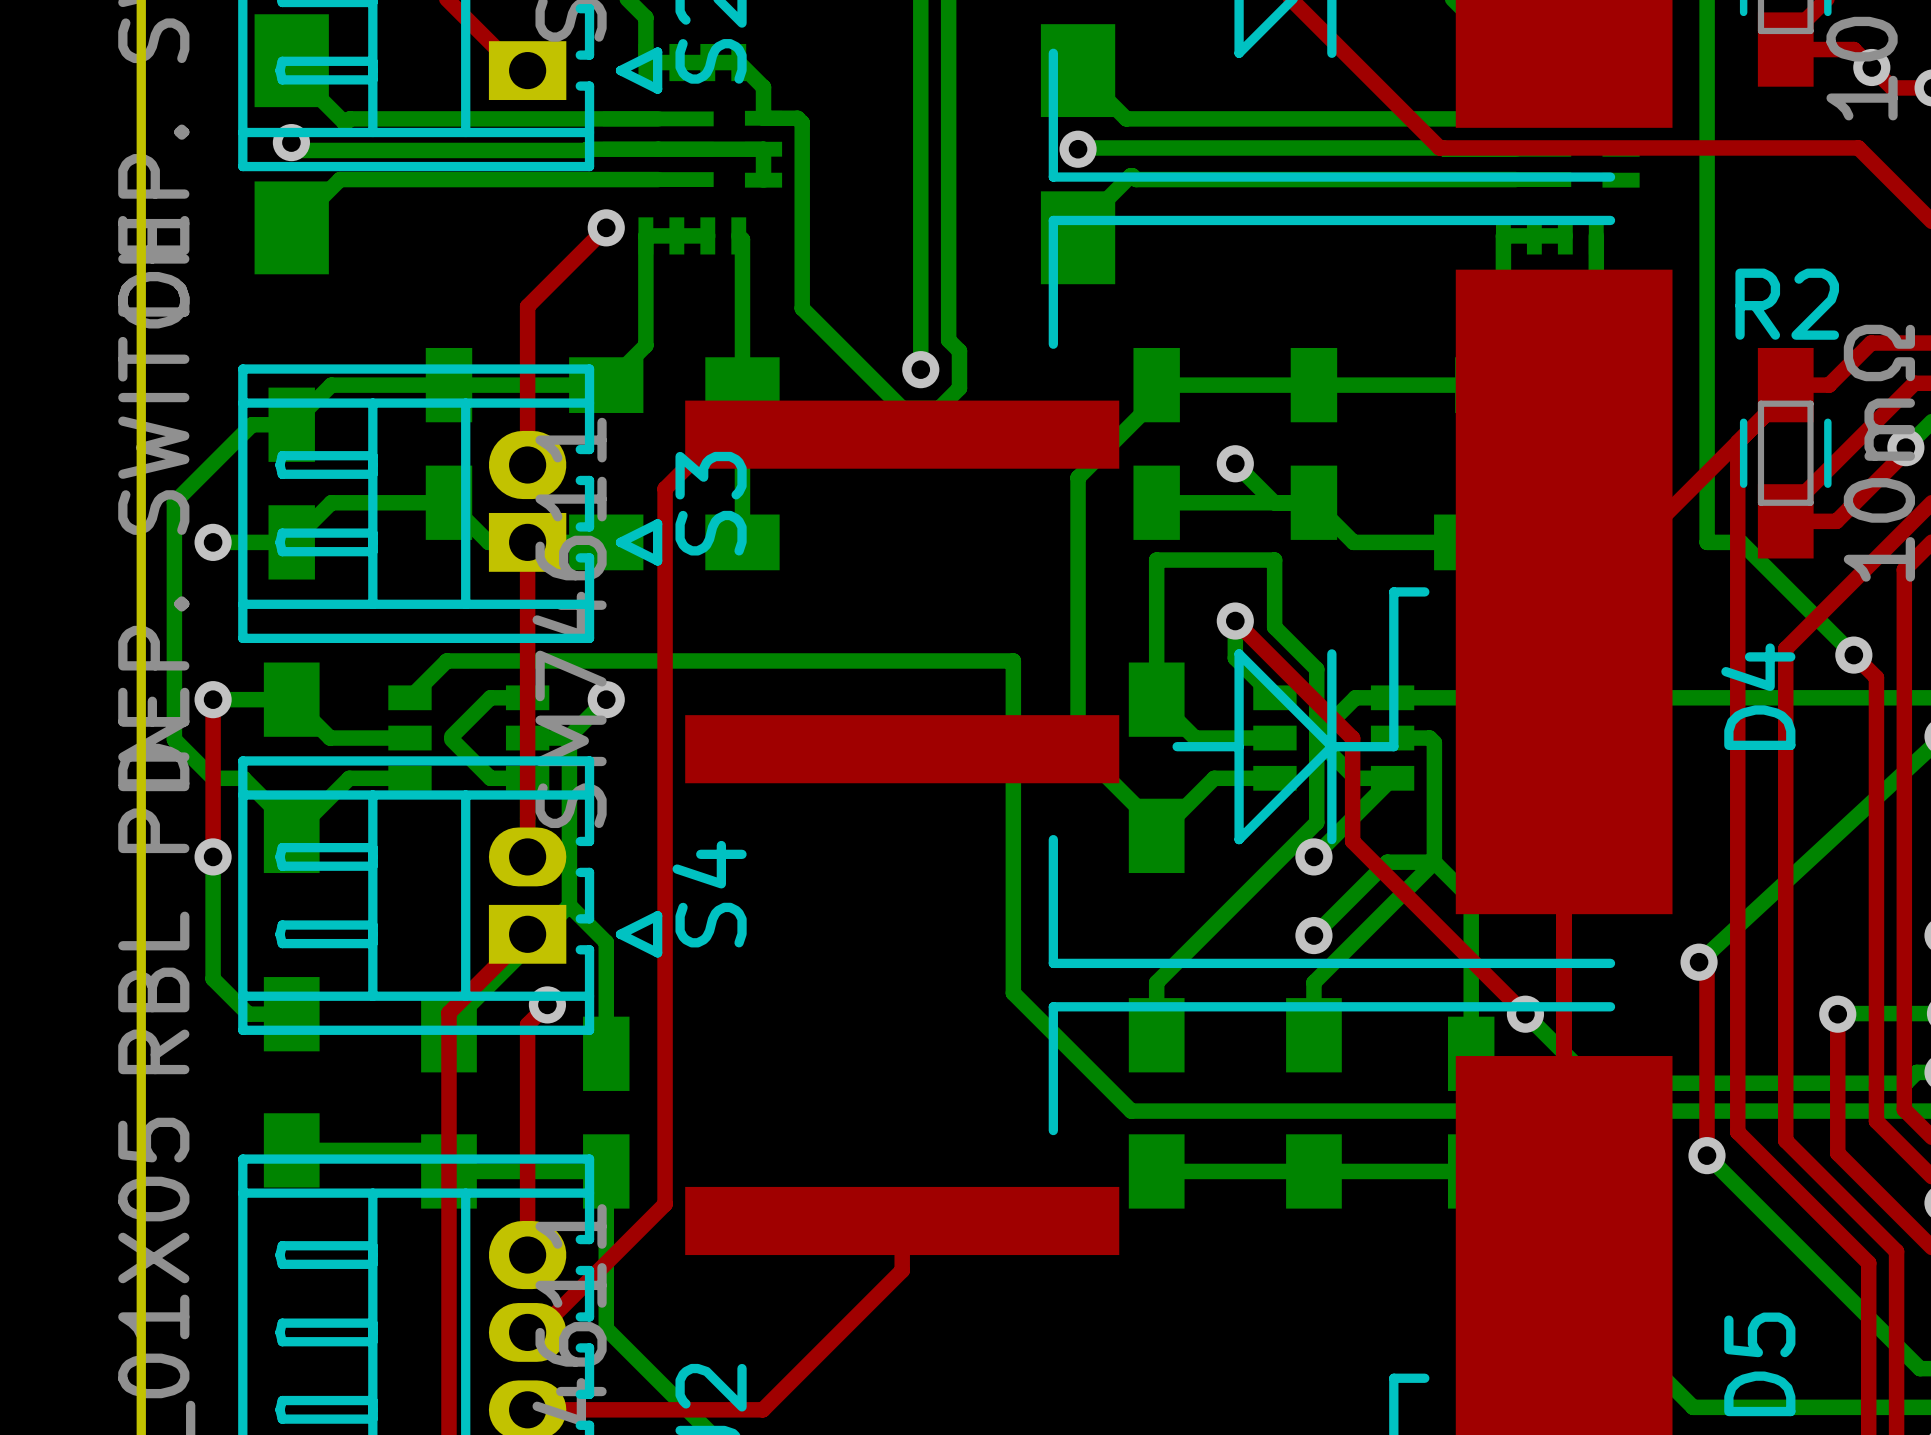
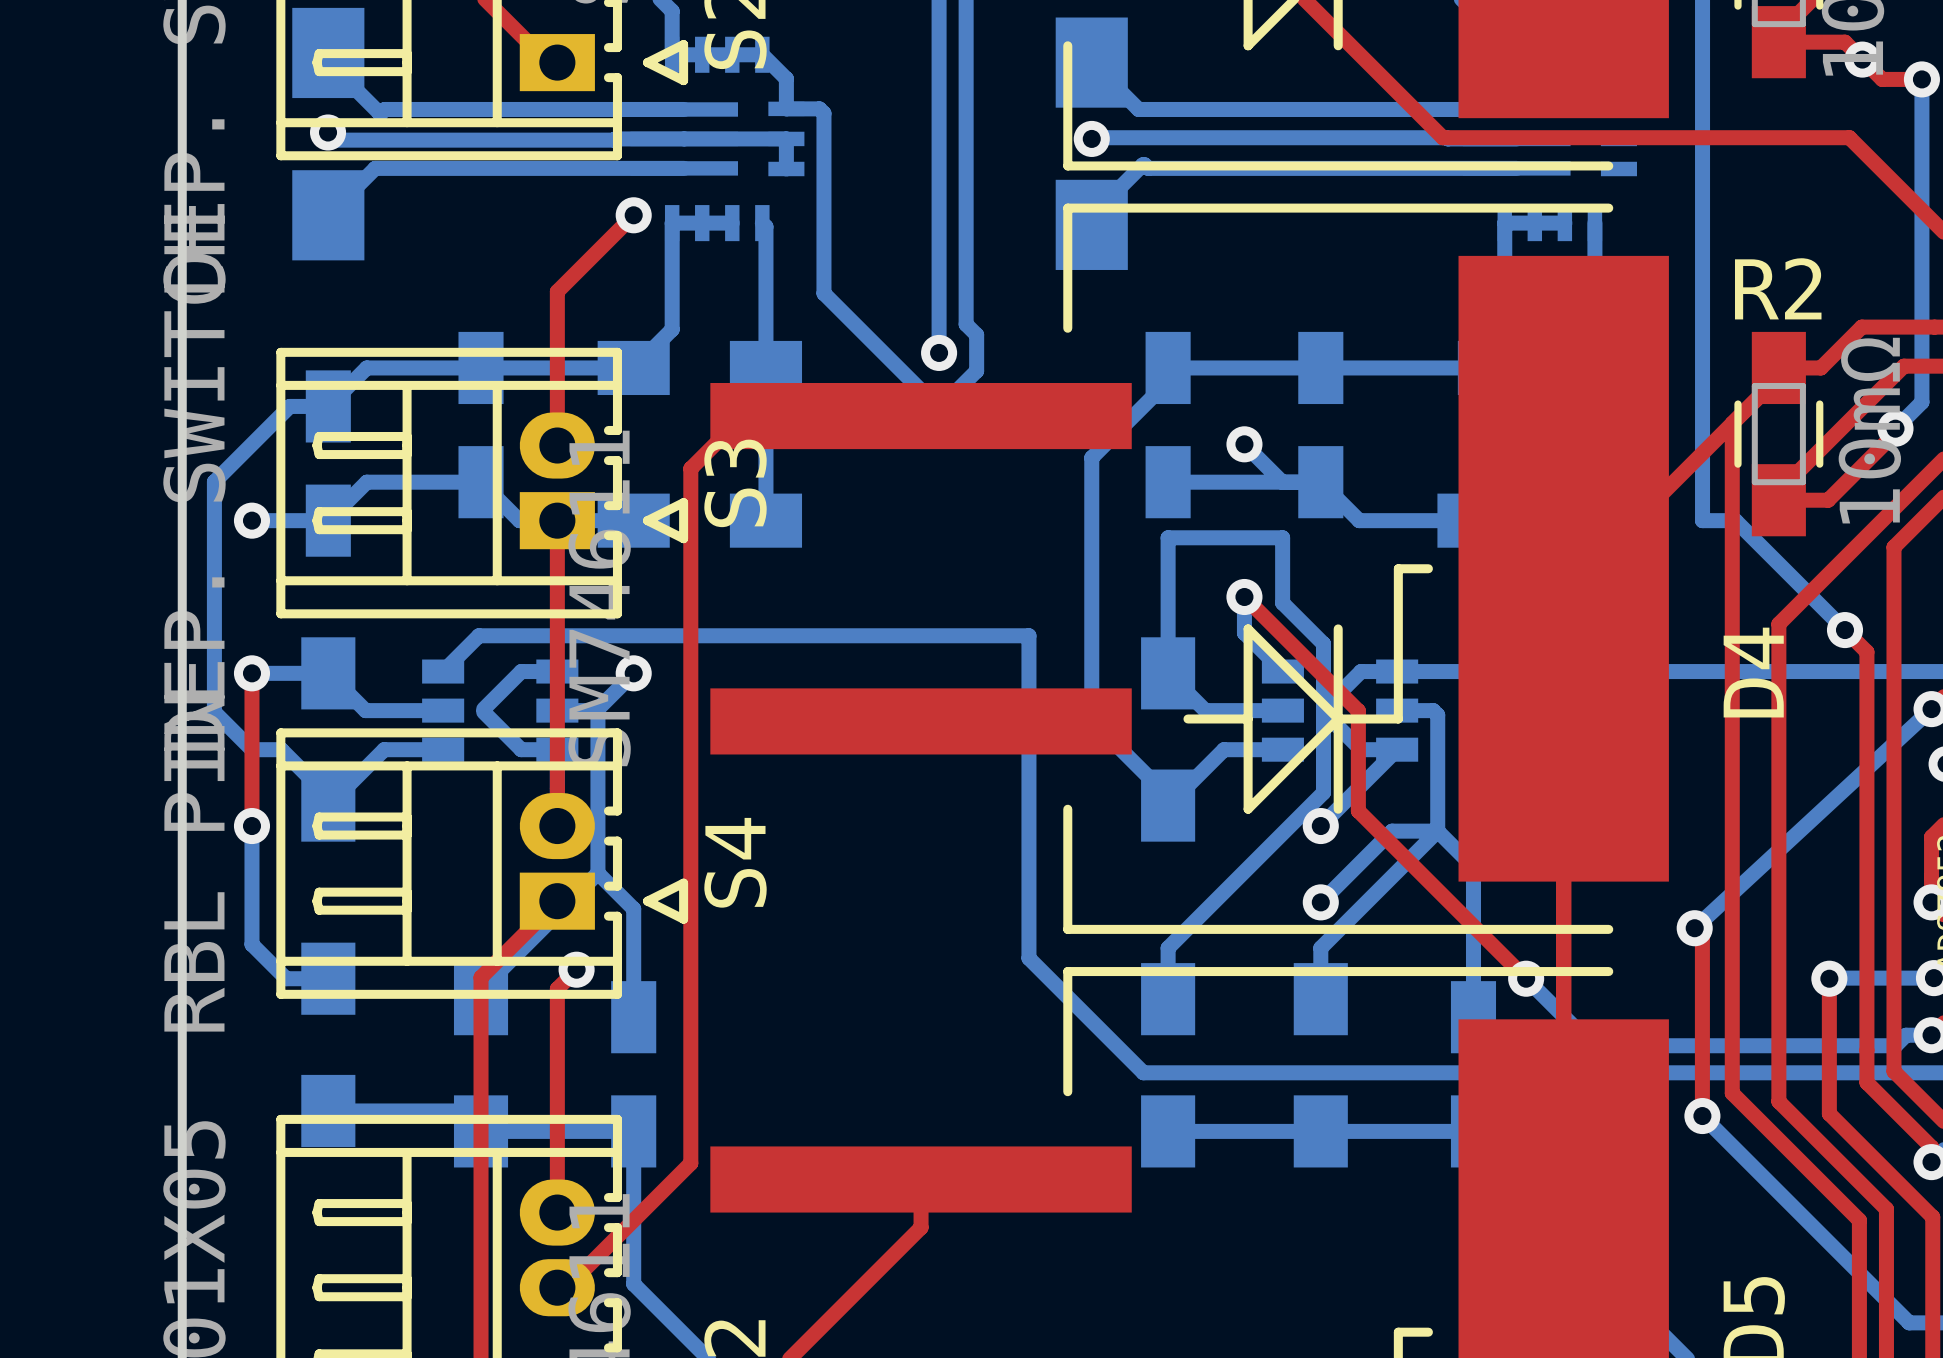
S4 footprint: [238, 756, 663, 1035] -> [276, 728, 689, 999]

